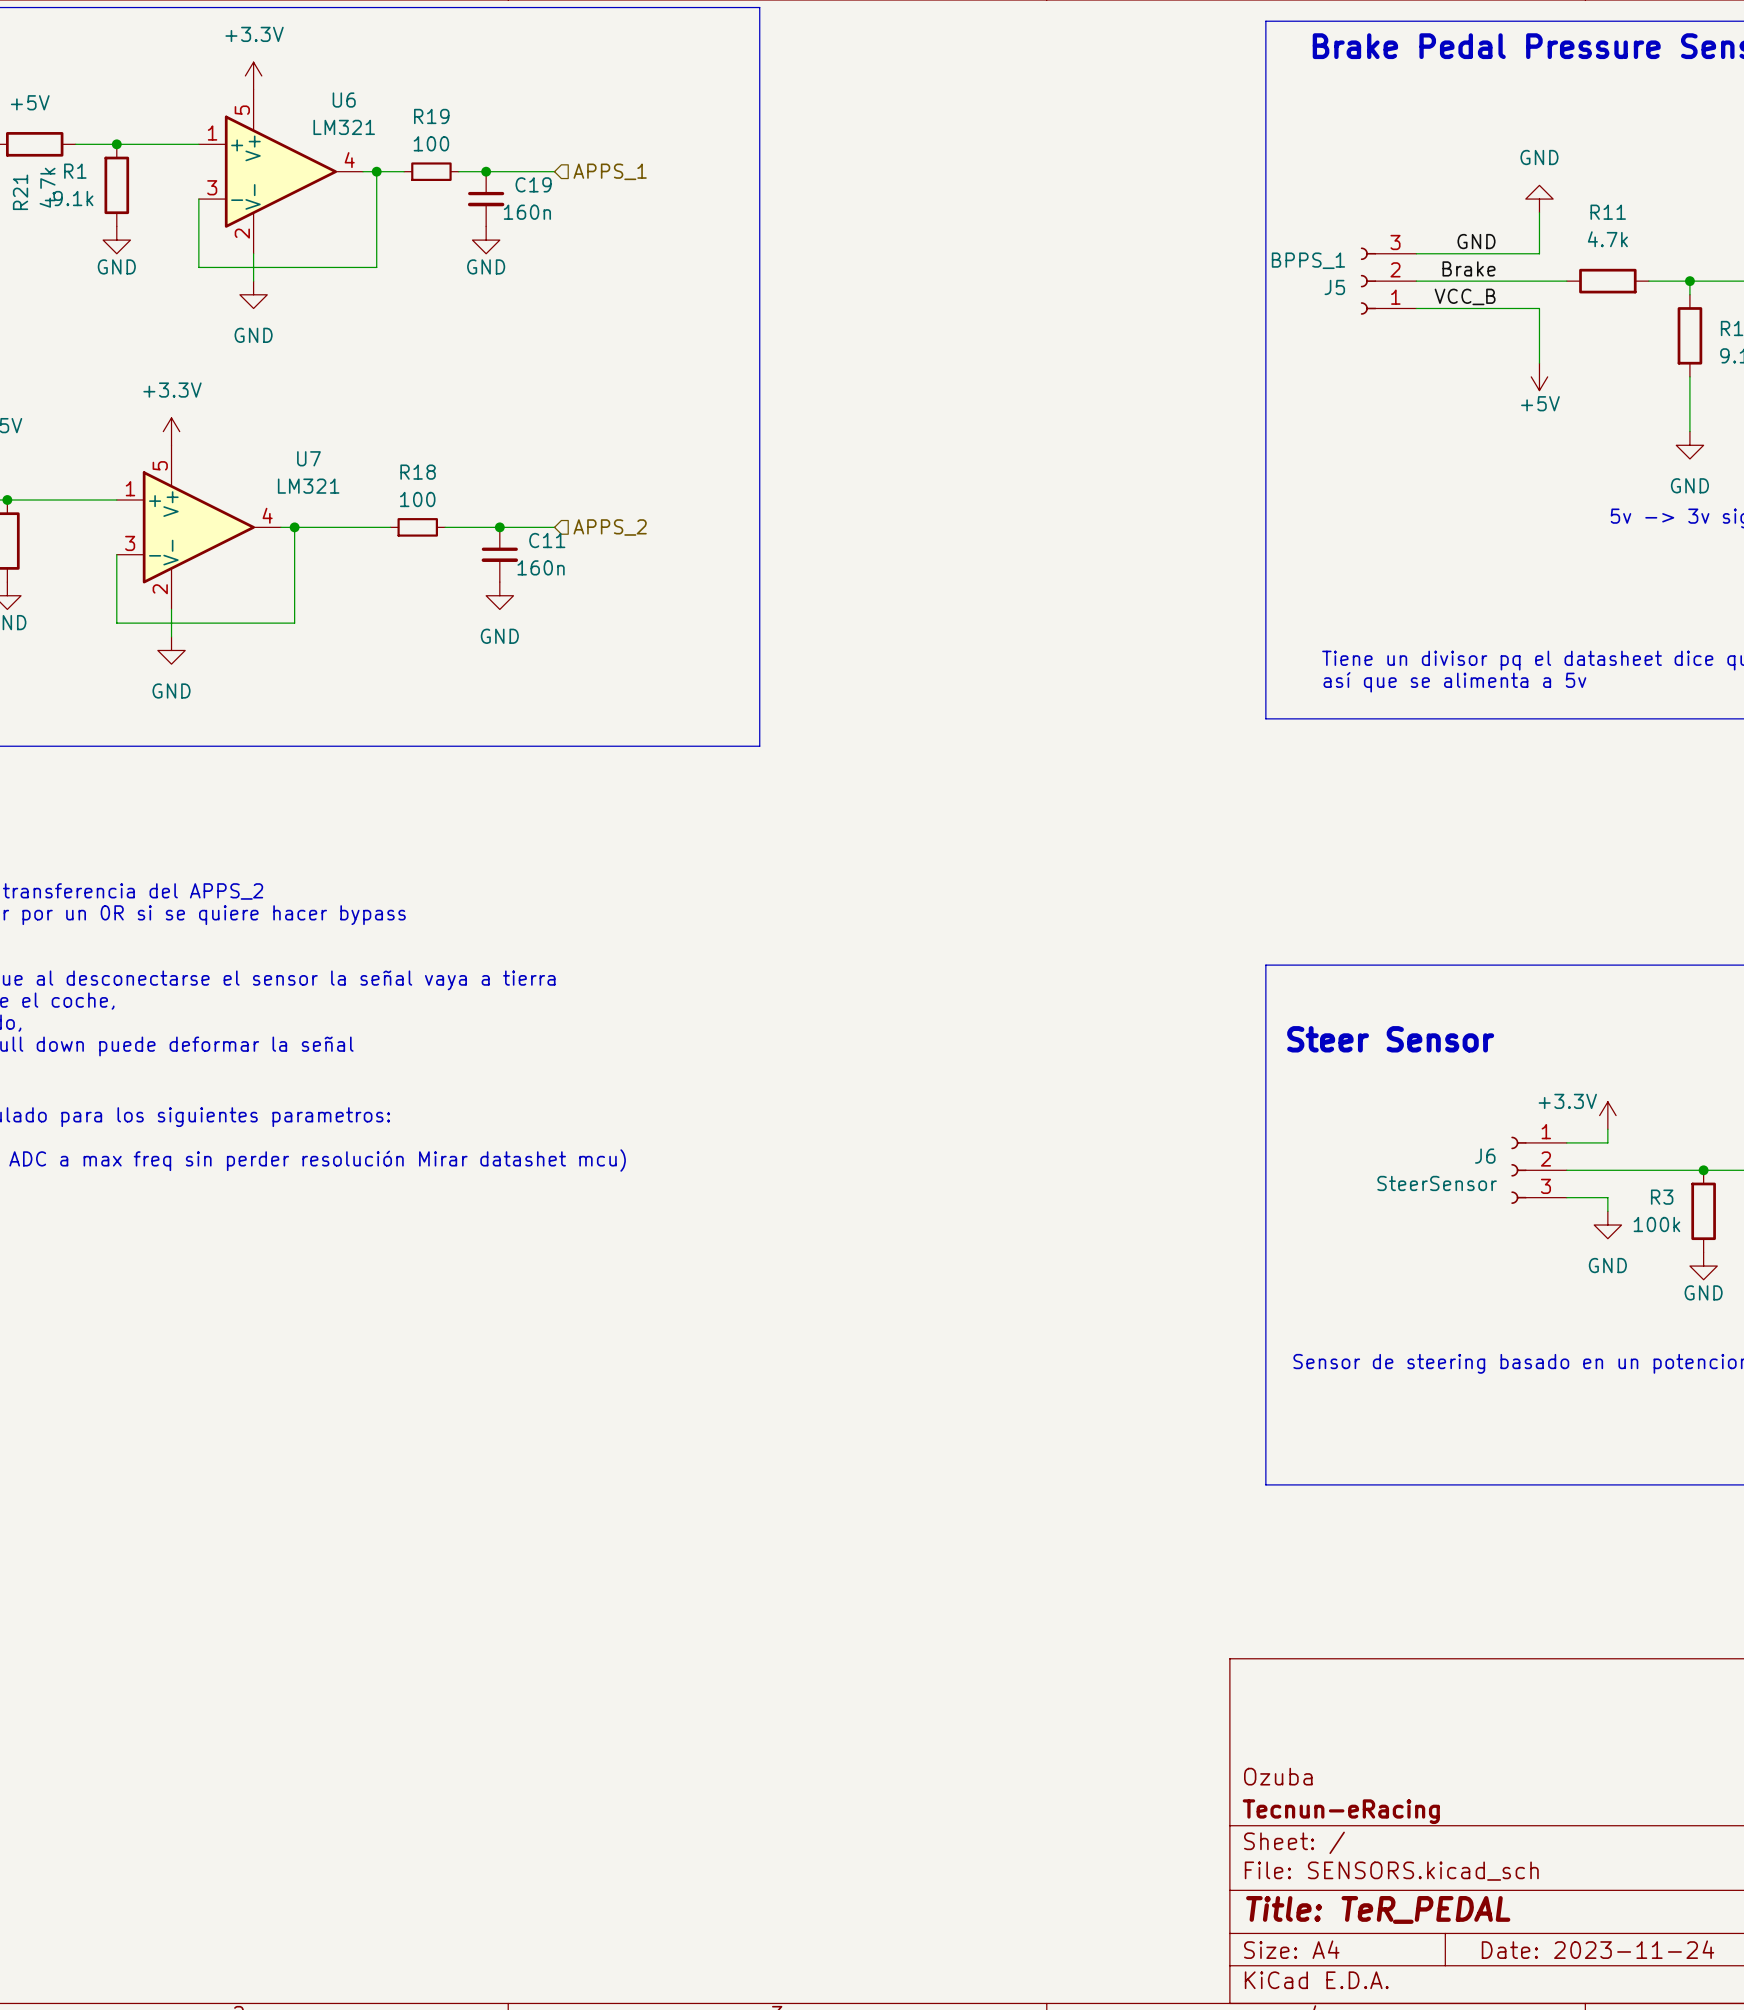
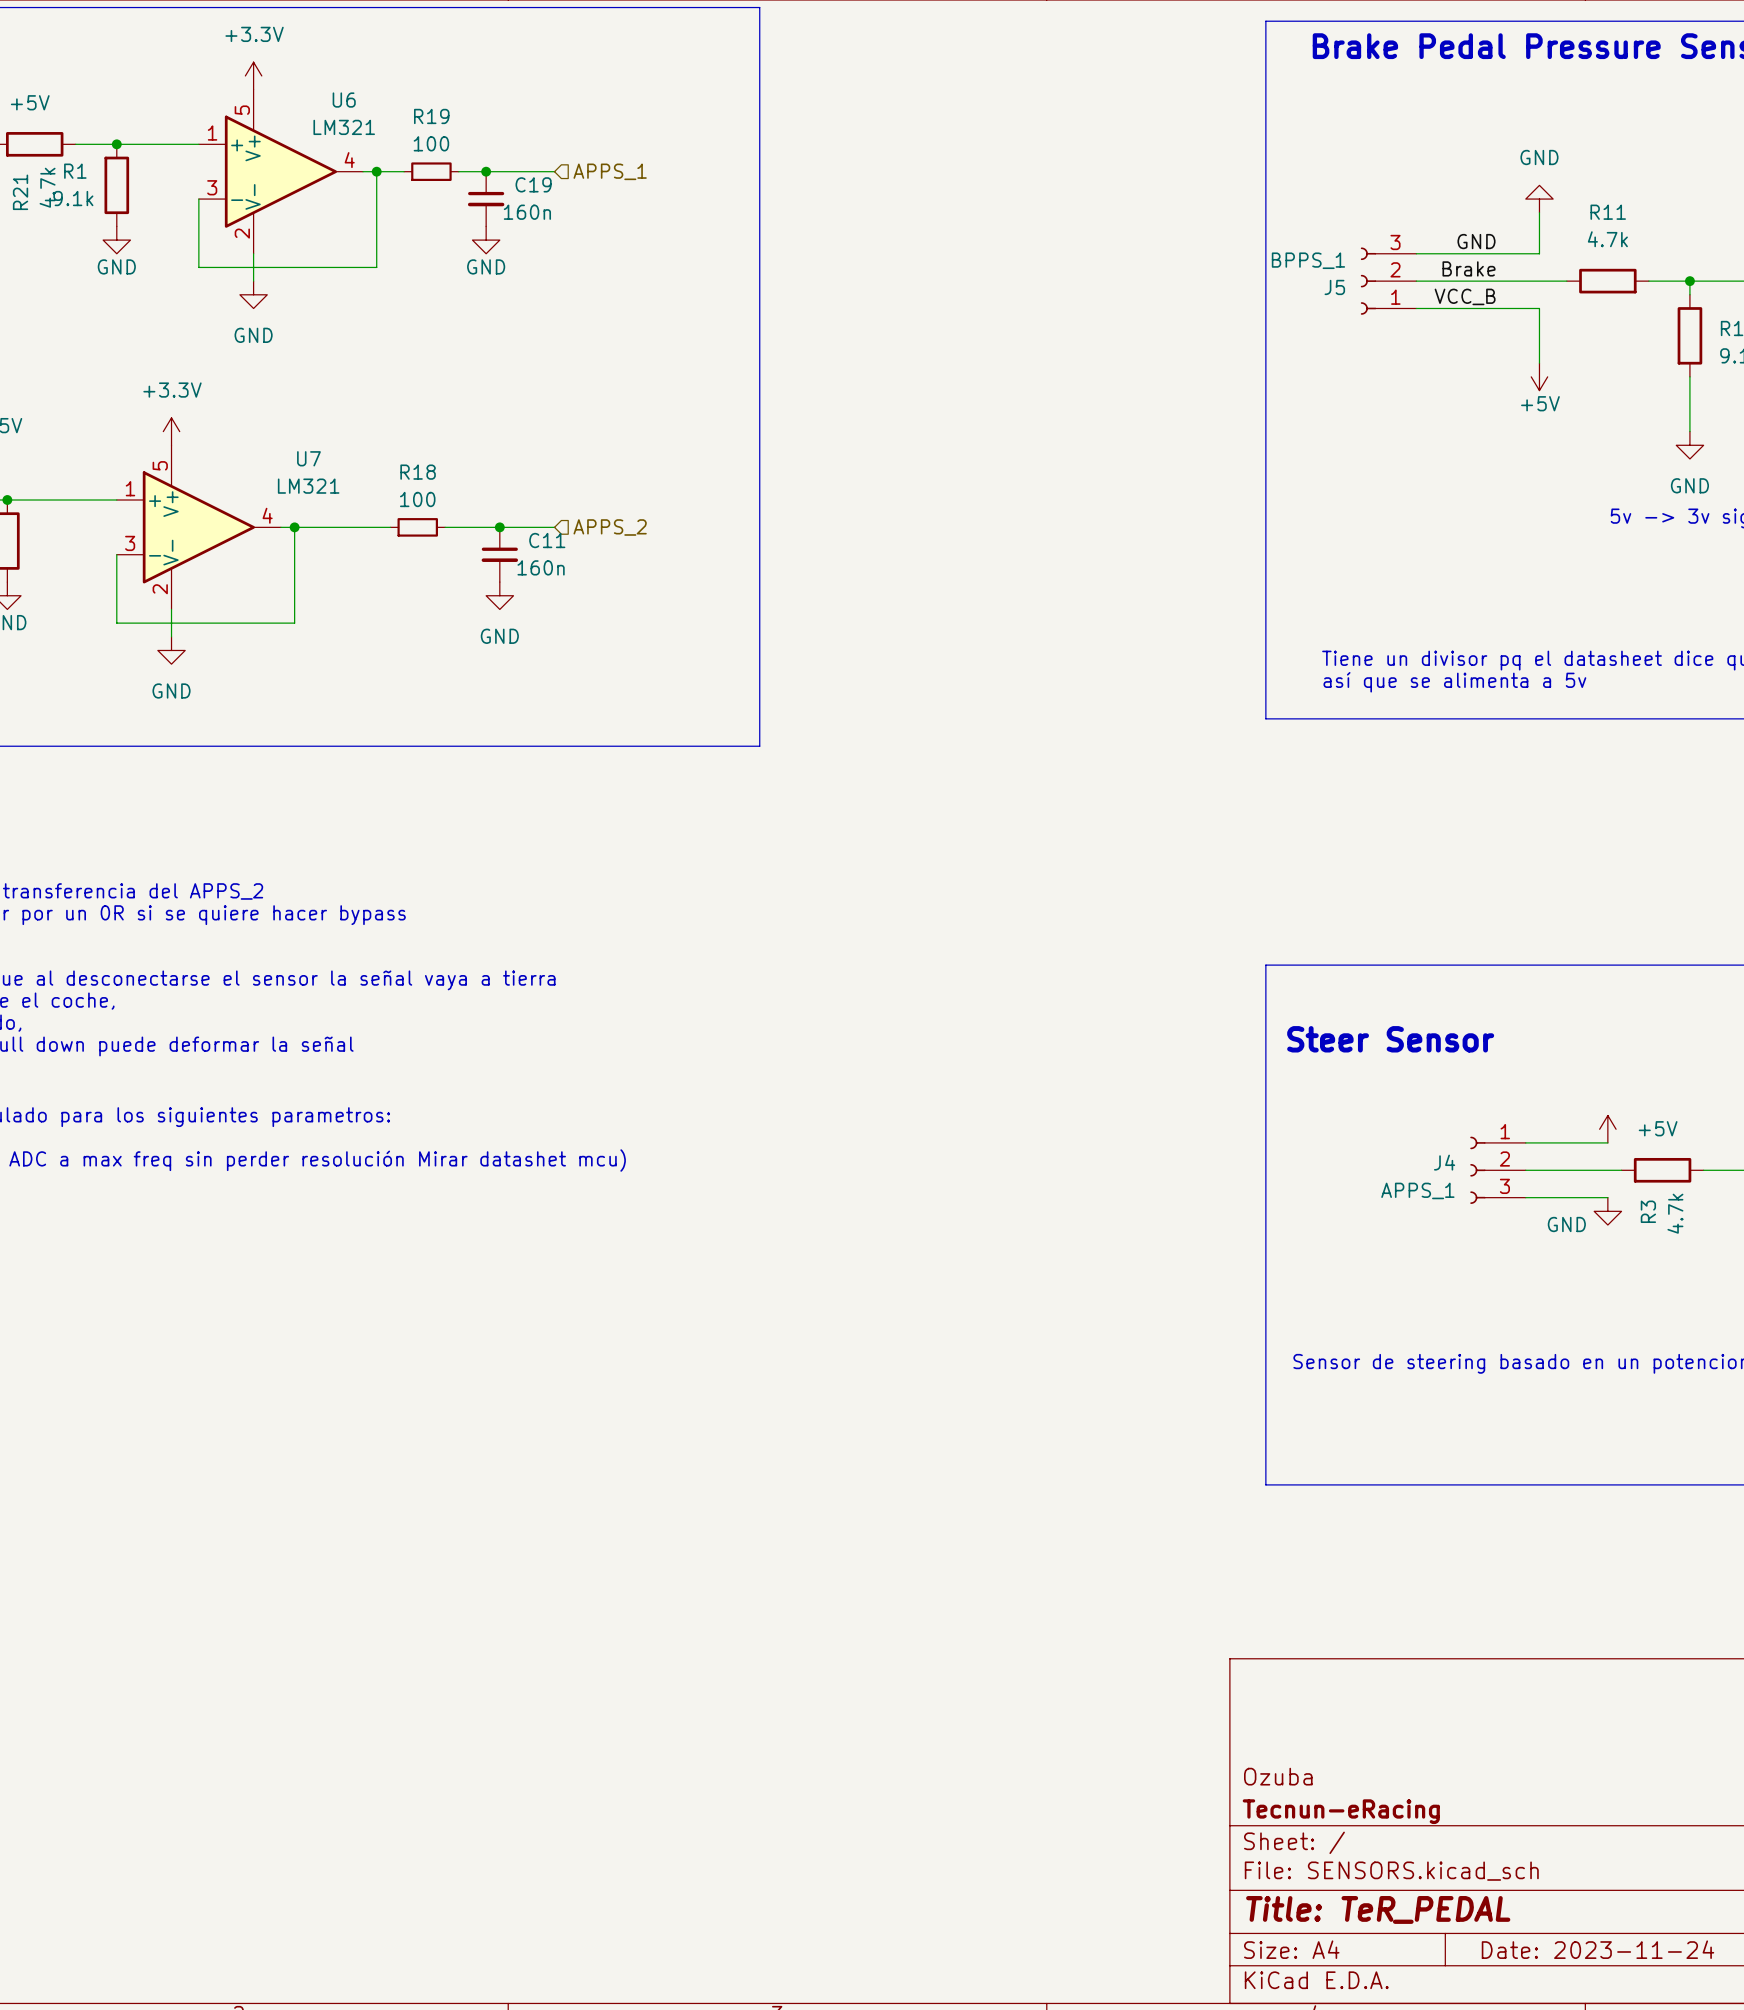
power symbol: +3.3V (1607, 1115) -> none
power symbol: none -> +5V (1607, 1129)
J4: none -> APPS_1 (1498, 1170)
J6: SteerSensor (1539, 1170) -> none
wire: (1621, 1170) (1703, 1170) -> none
junction: (1703, 1170) -> none
R3 name position: R3 (1662, 1197) -> R3 (1648, 1211)
R3 rotation: 0° (1703, 1211) -> 90° clockwise (1662, 1170)
R3 position: (1703, 1211) -> (1662, 1170)
R3 value: 100k (1656, 1224) -> 4.7k (1675, 1213)
power symbol position: GND (1607, 1225) -> GND (1607, 1211)
power symbol text position: GND (1607, 1265) -> GND (1566, 1224)
power symbol: GND (1703, 1266) -> none

